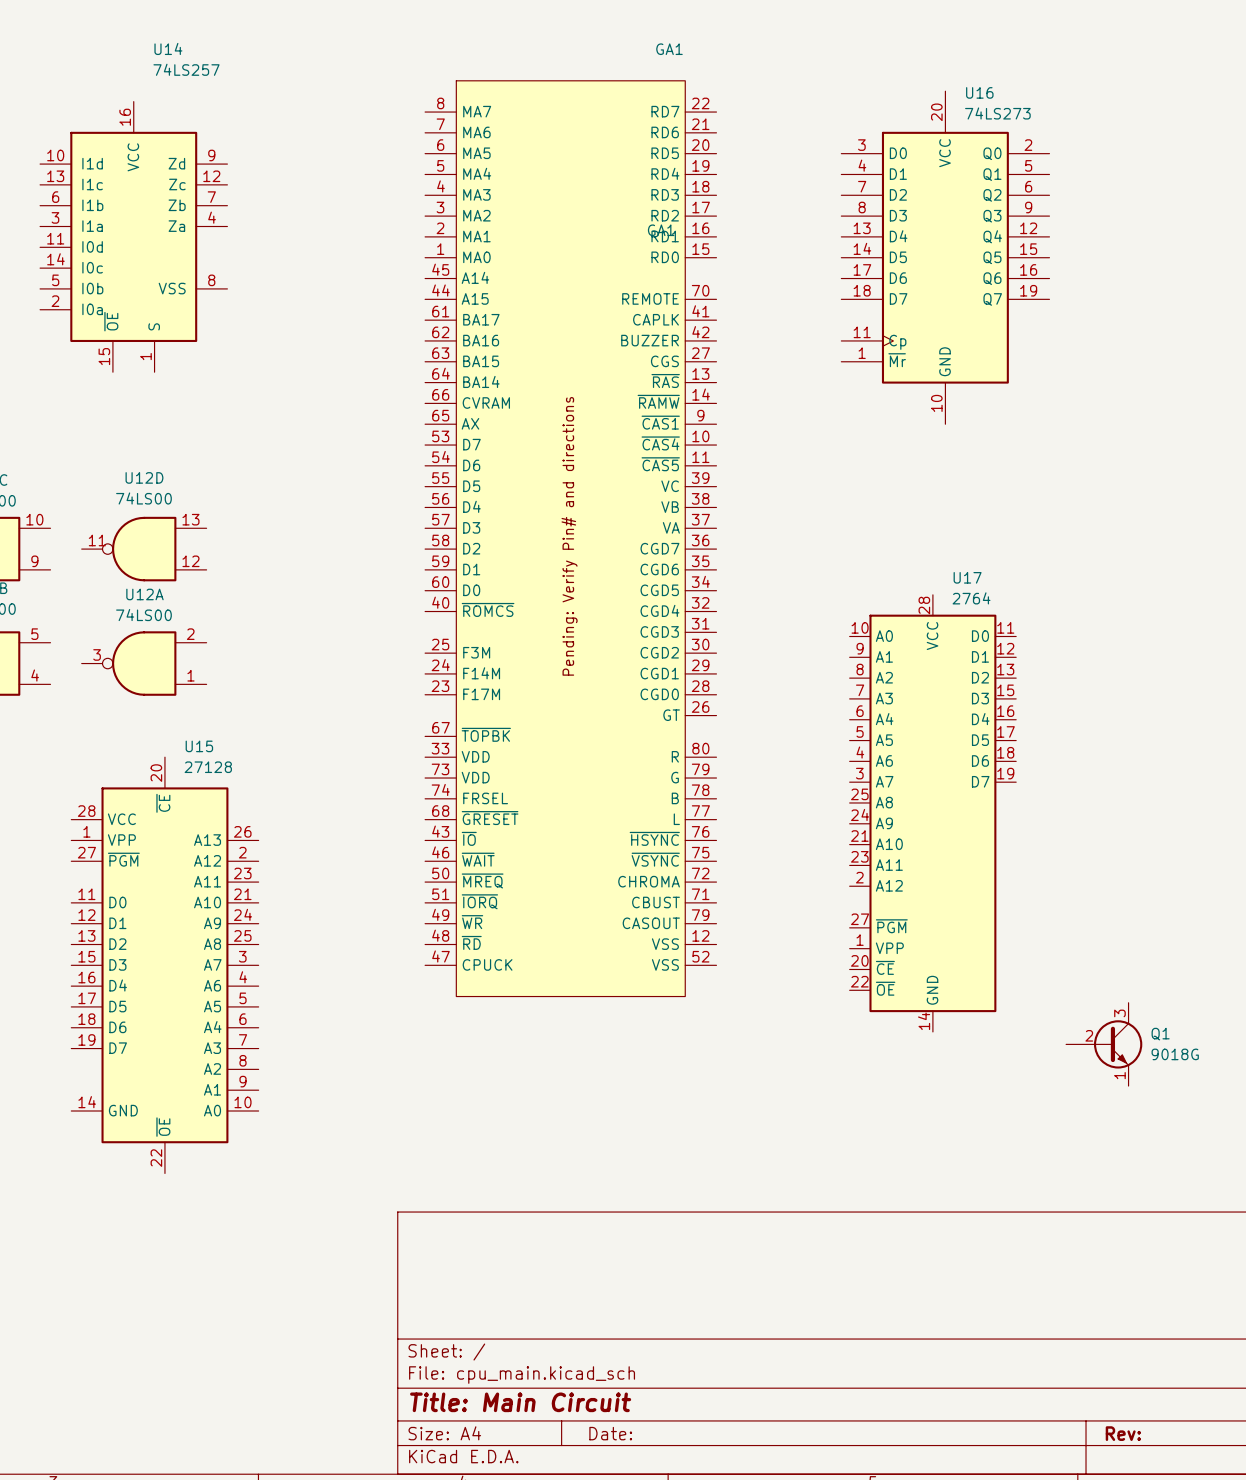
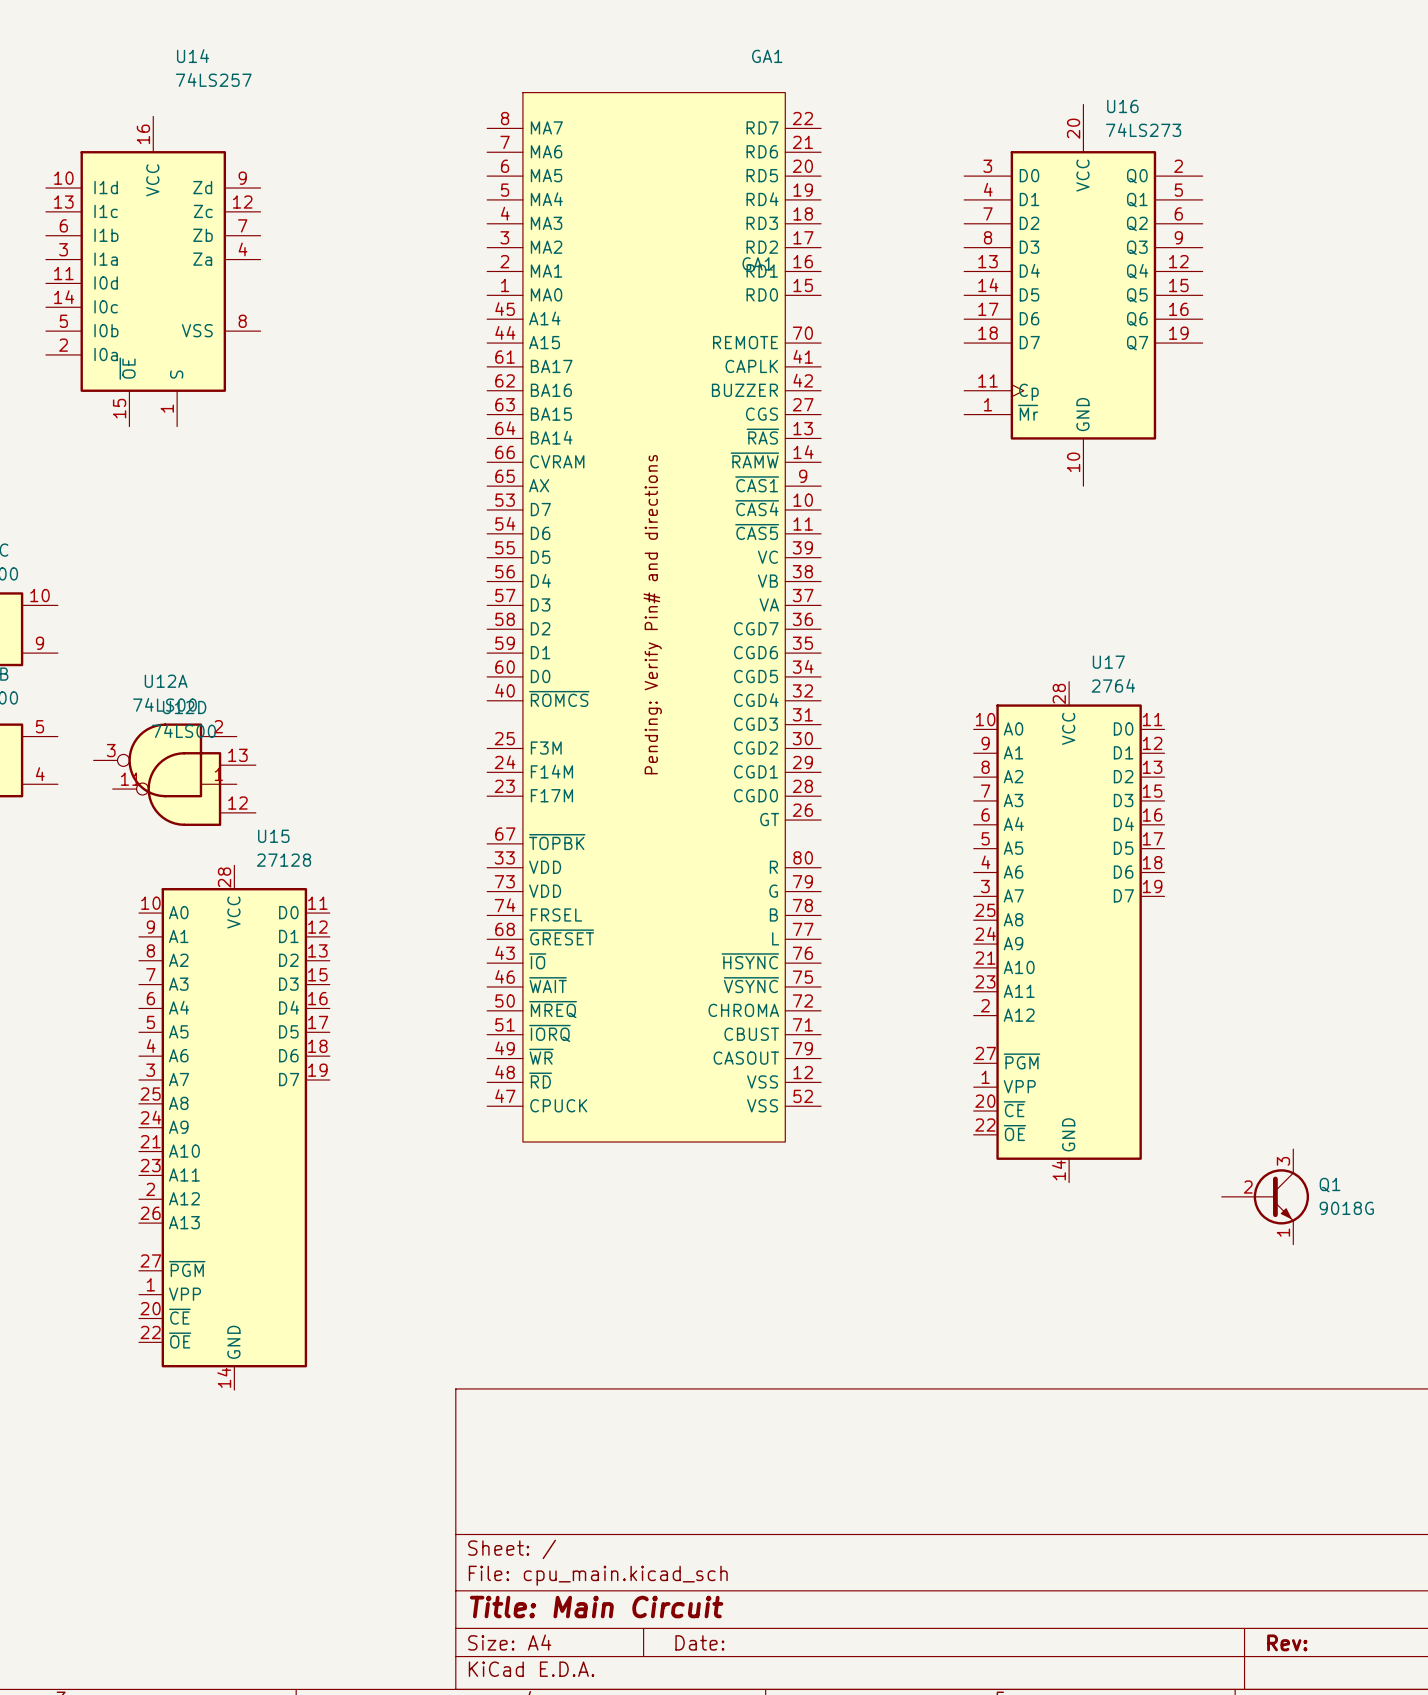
U12D position: (144, 549) -> (184, 789)
U15 name position: U15 (199, 746) -> U15 (273, 836)
U15 symbol: [71, 757, 259, 1174] -> [138, 865, 330, 1391]
U15 value position: 27128 (208, 767) -> 27128 (284, 860)

